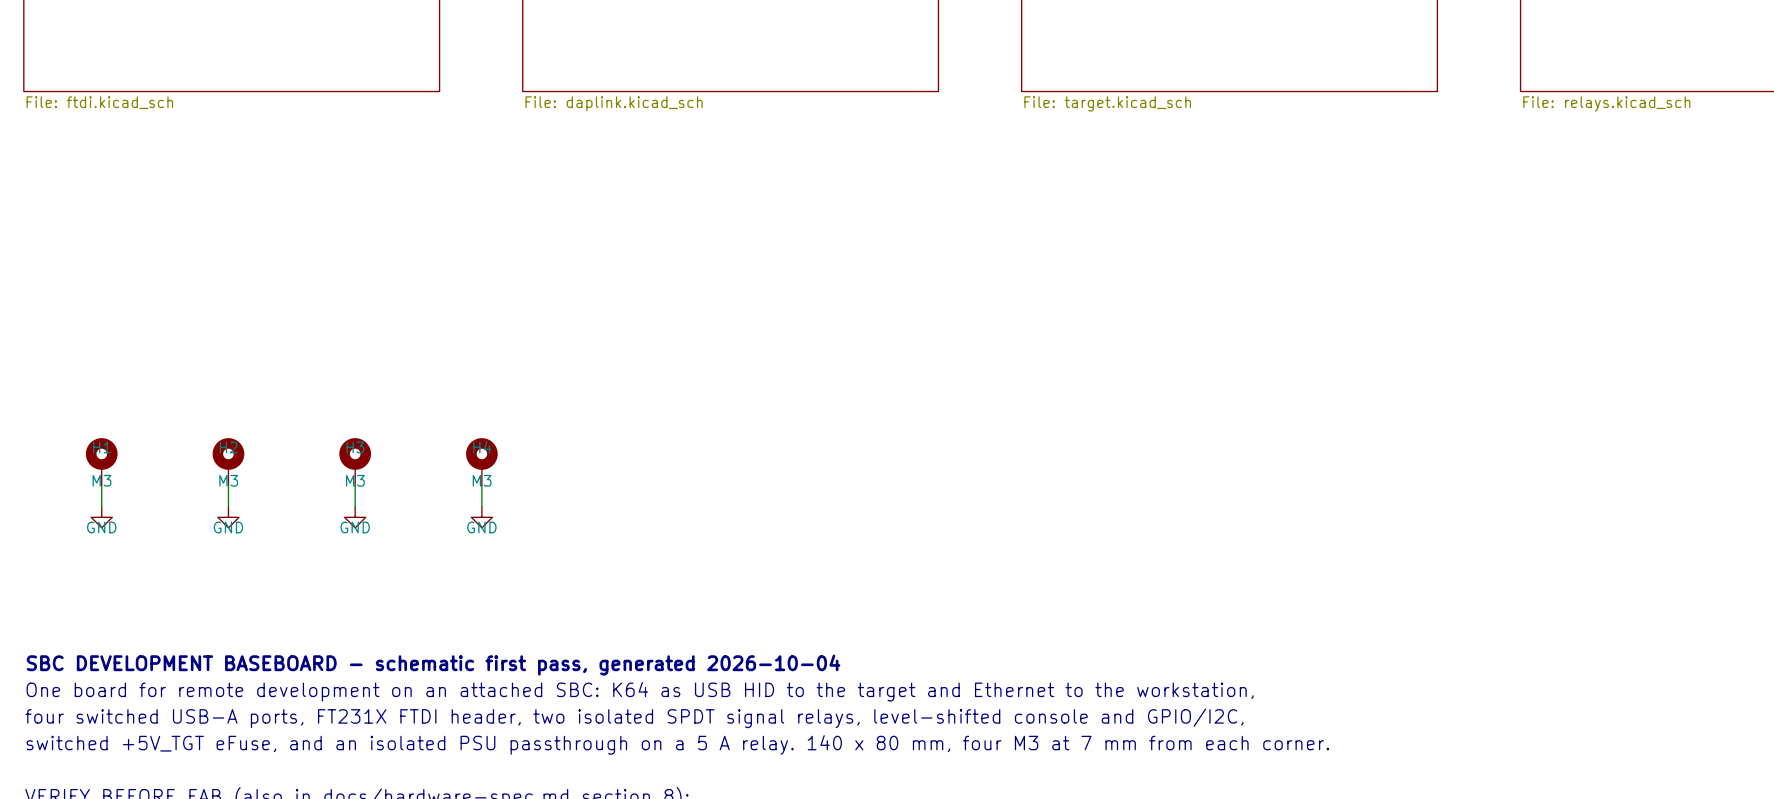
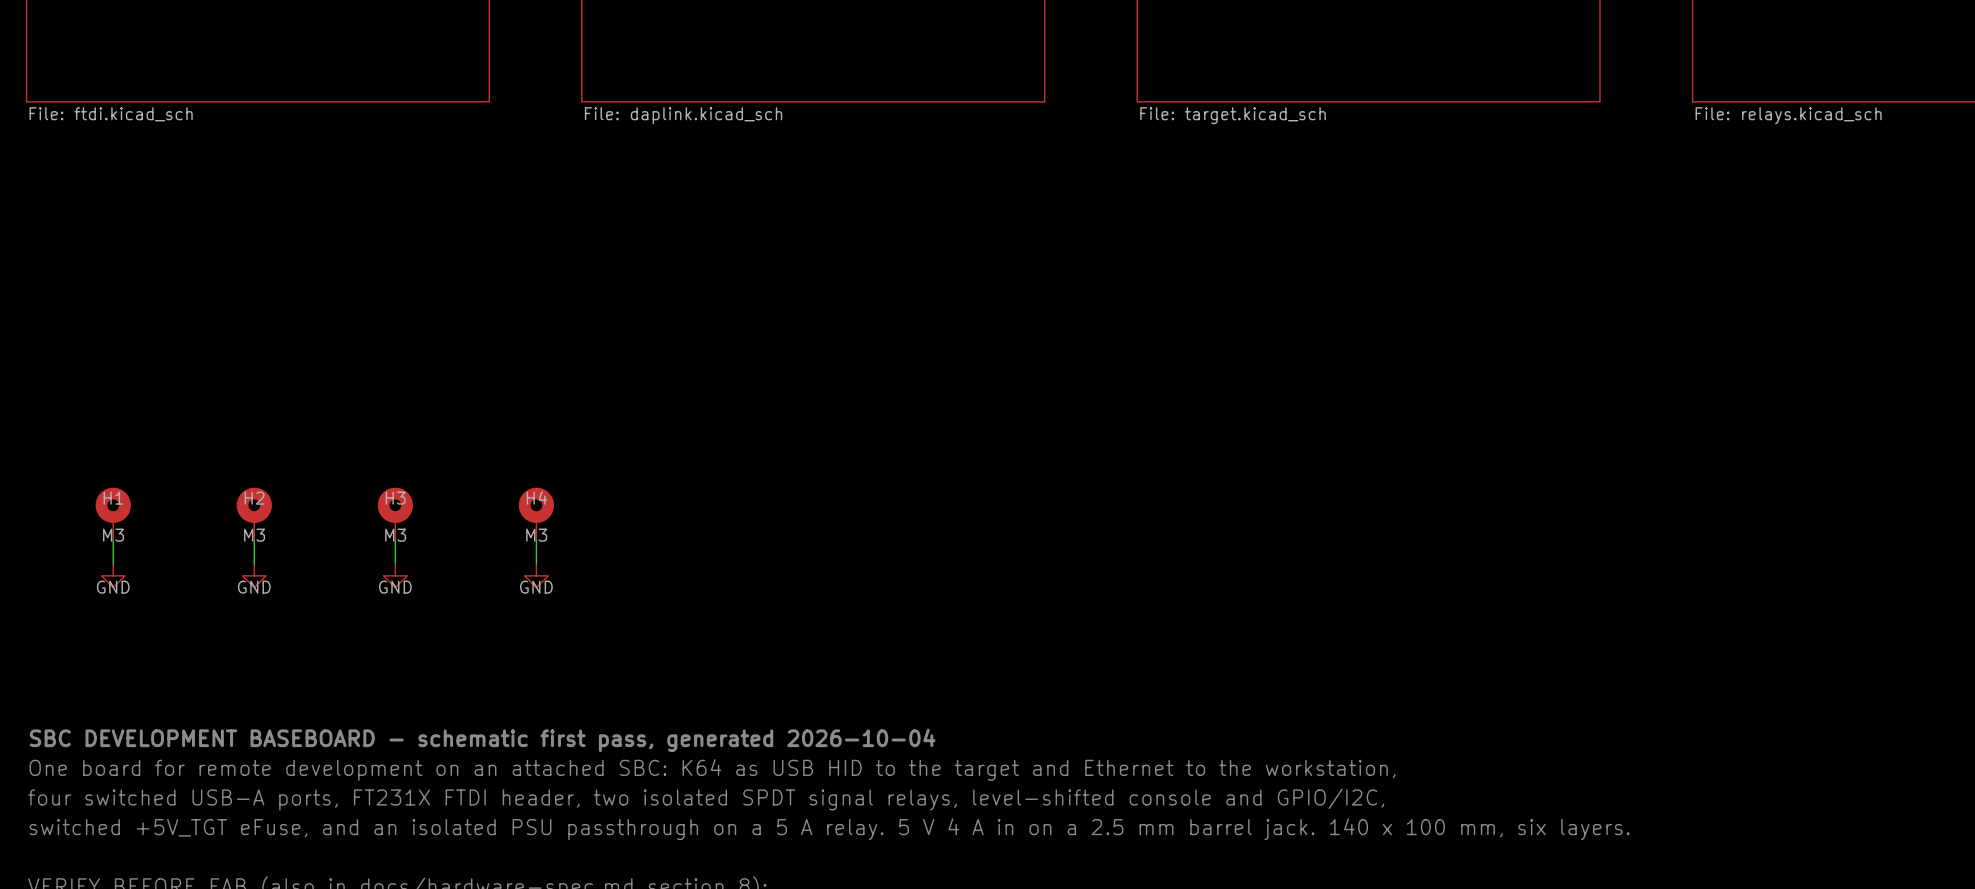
text: switched +5V_TGT eFuse, and an isolated PSU passthrough on a 5 A relay. 140 x 80 mm, four M3 at 7 mm from each corner. (677, 744) -> switched +5V_TGT eFuse, and an isolated PSU passthrough on a 5 A relay. 5 V 4 A in on a 2.5 mm barrel jack. 140 x 100 mm, six layers. (829, 829)

